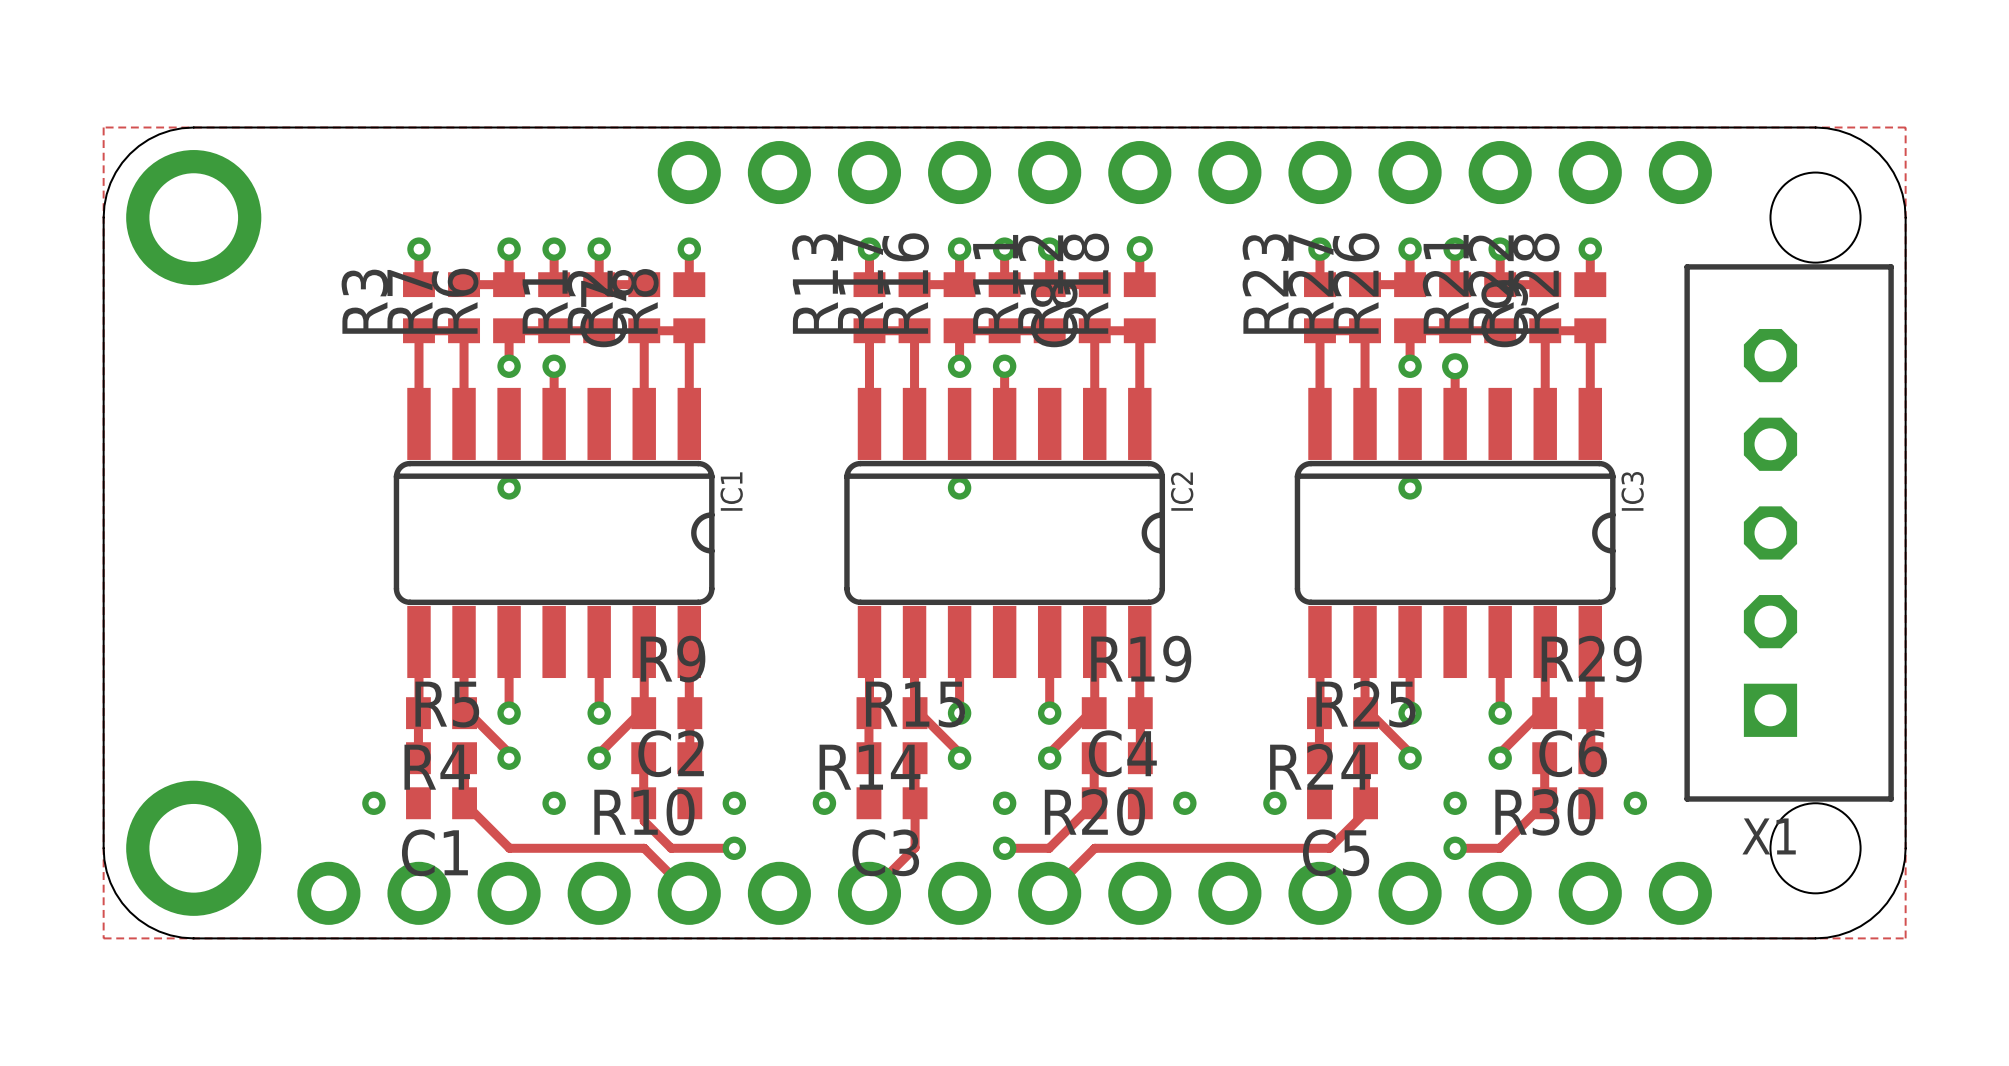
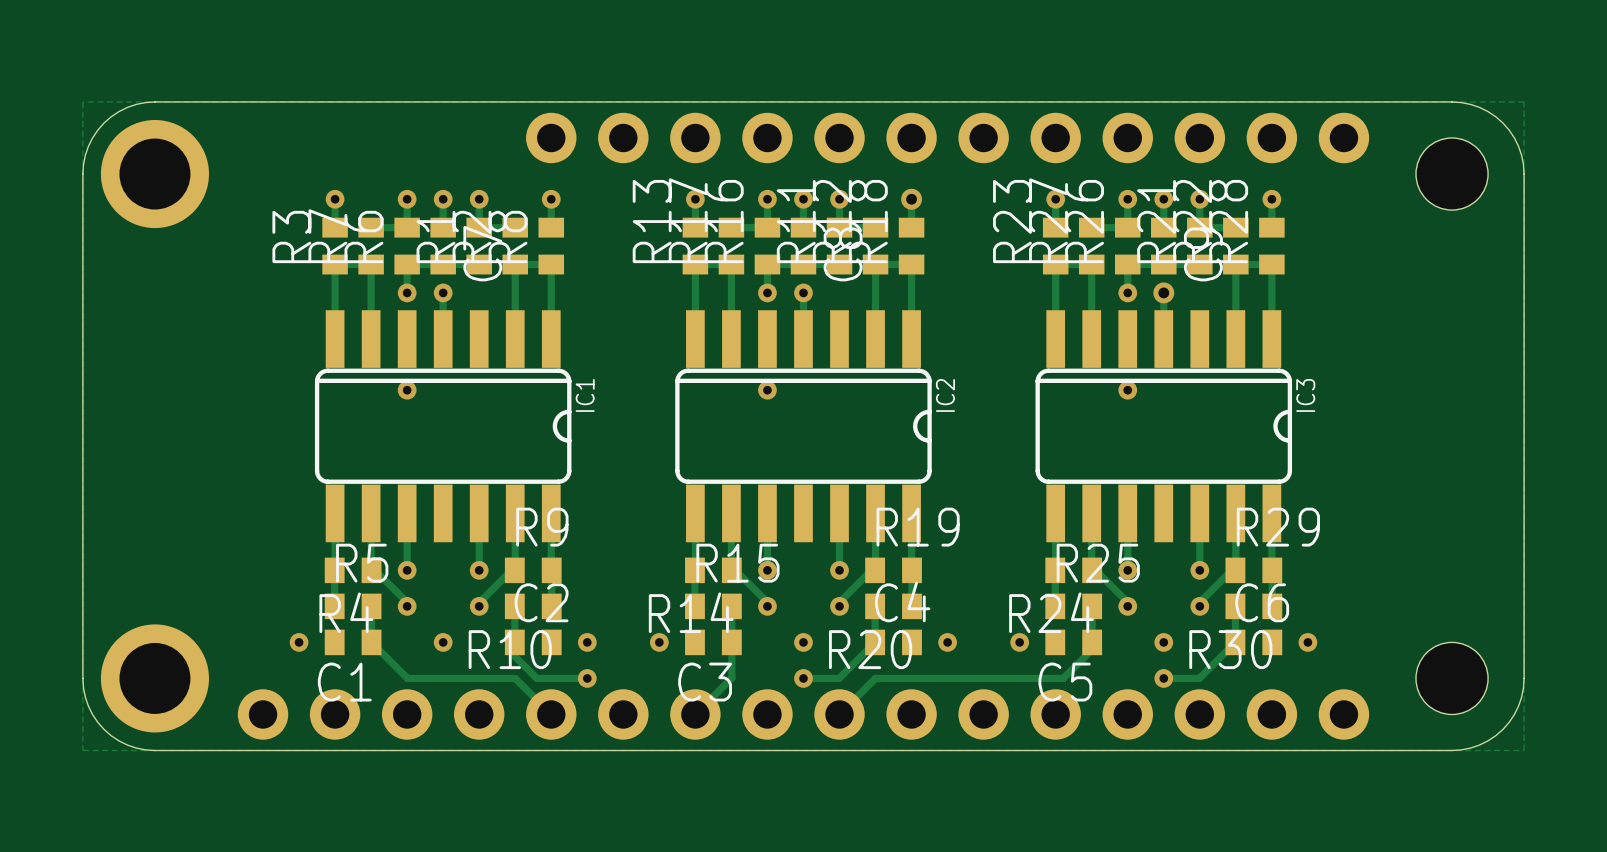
X1: (1789, 532) -> none

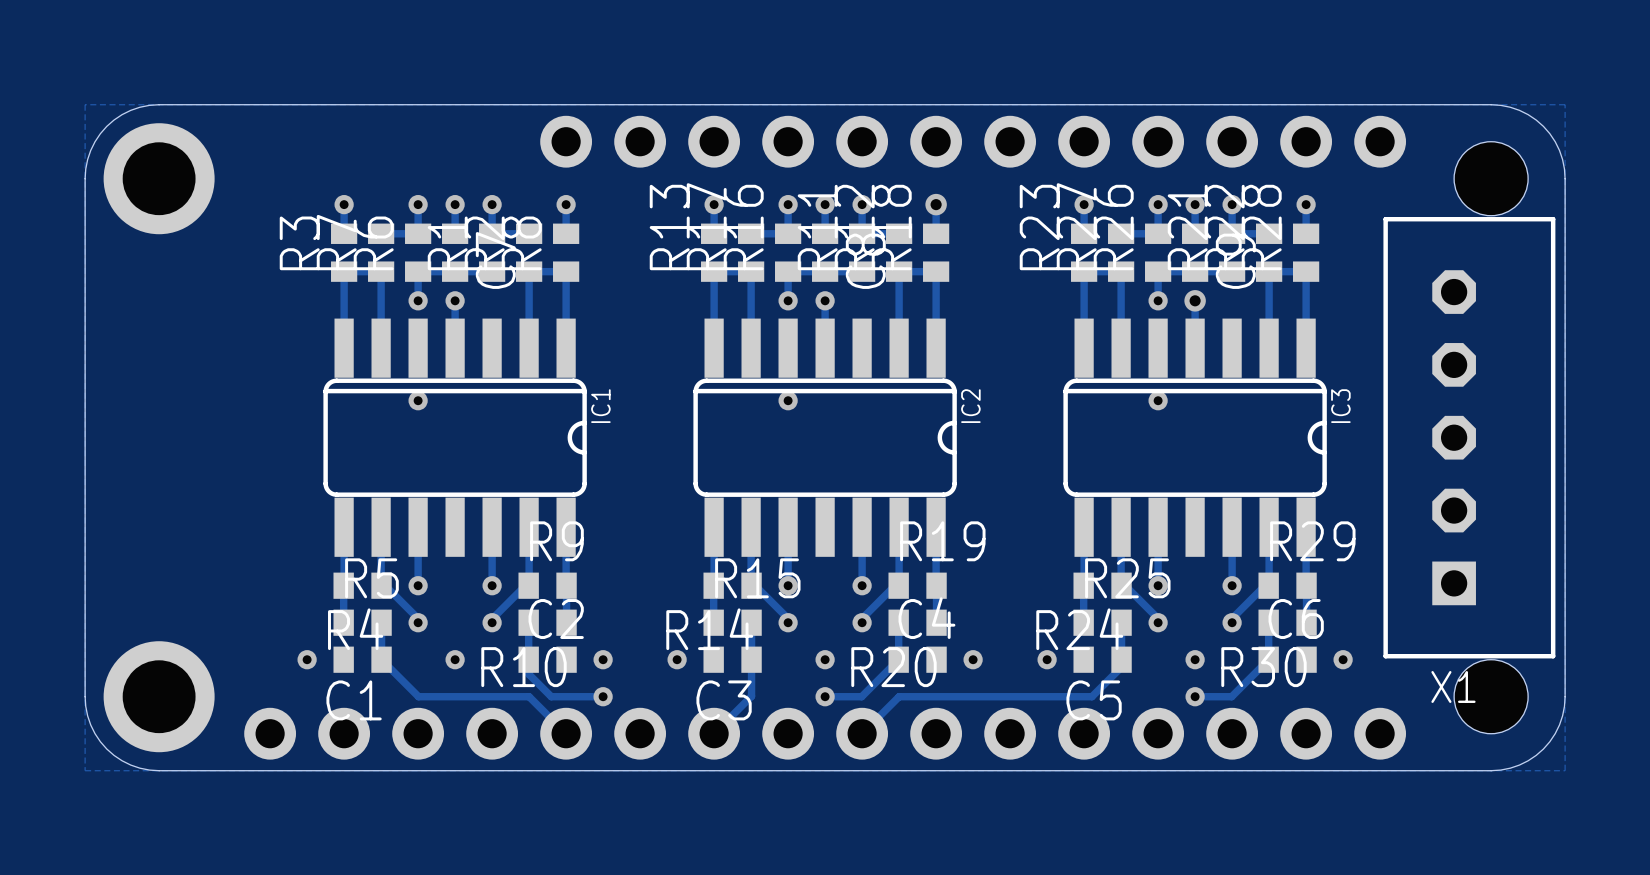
X1: none -> (1469, 437)

